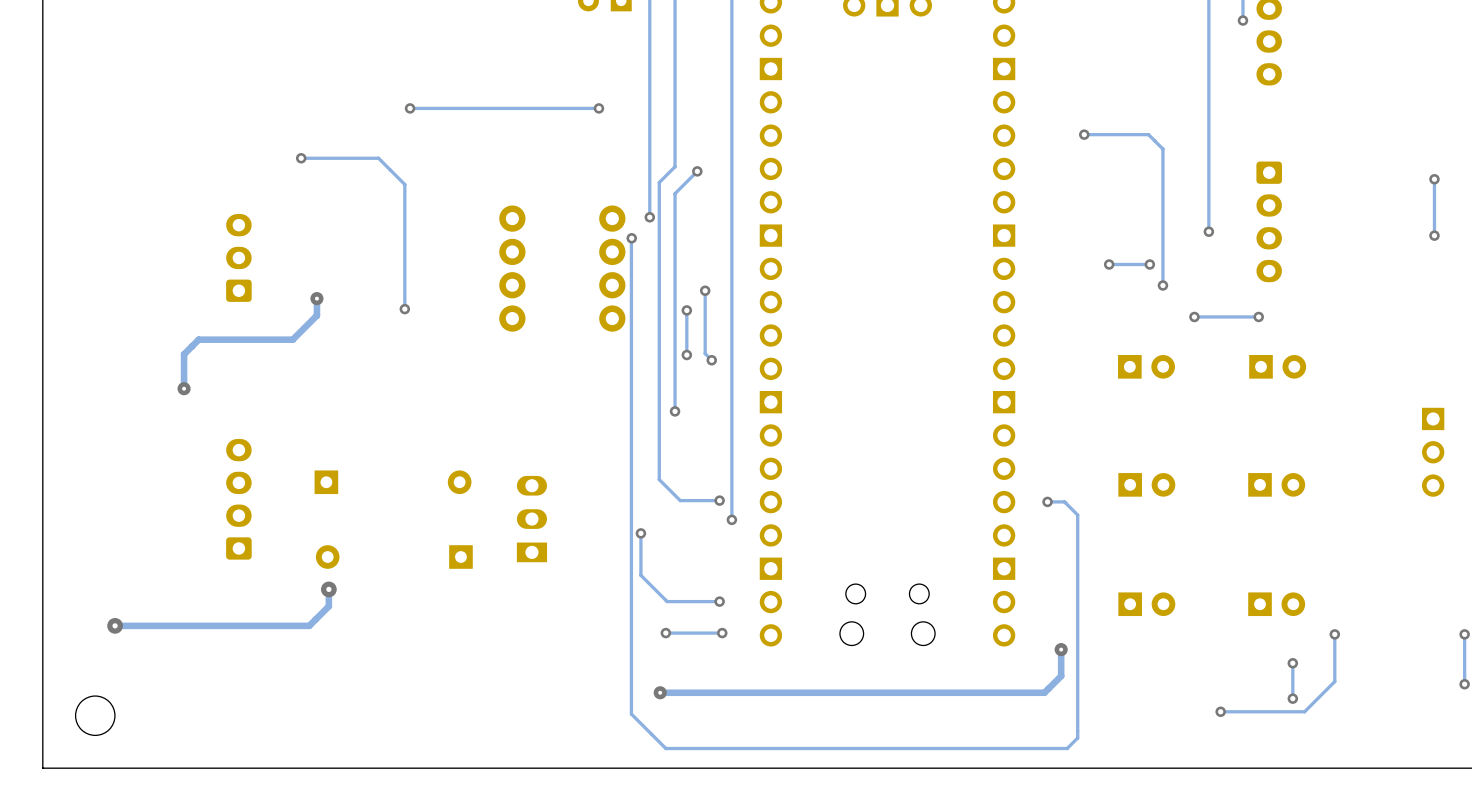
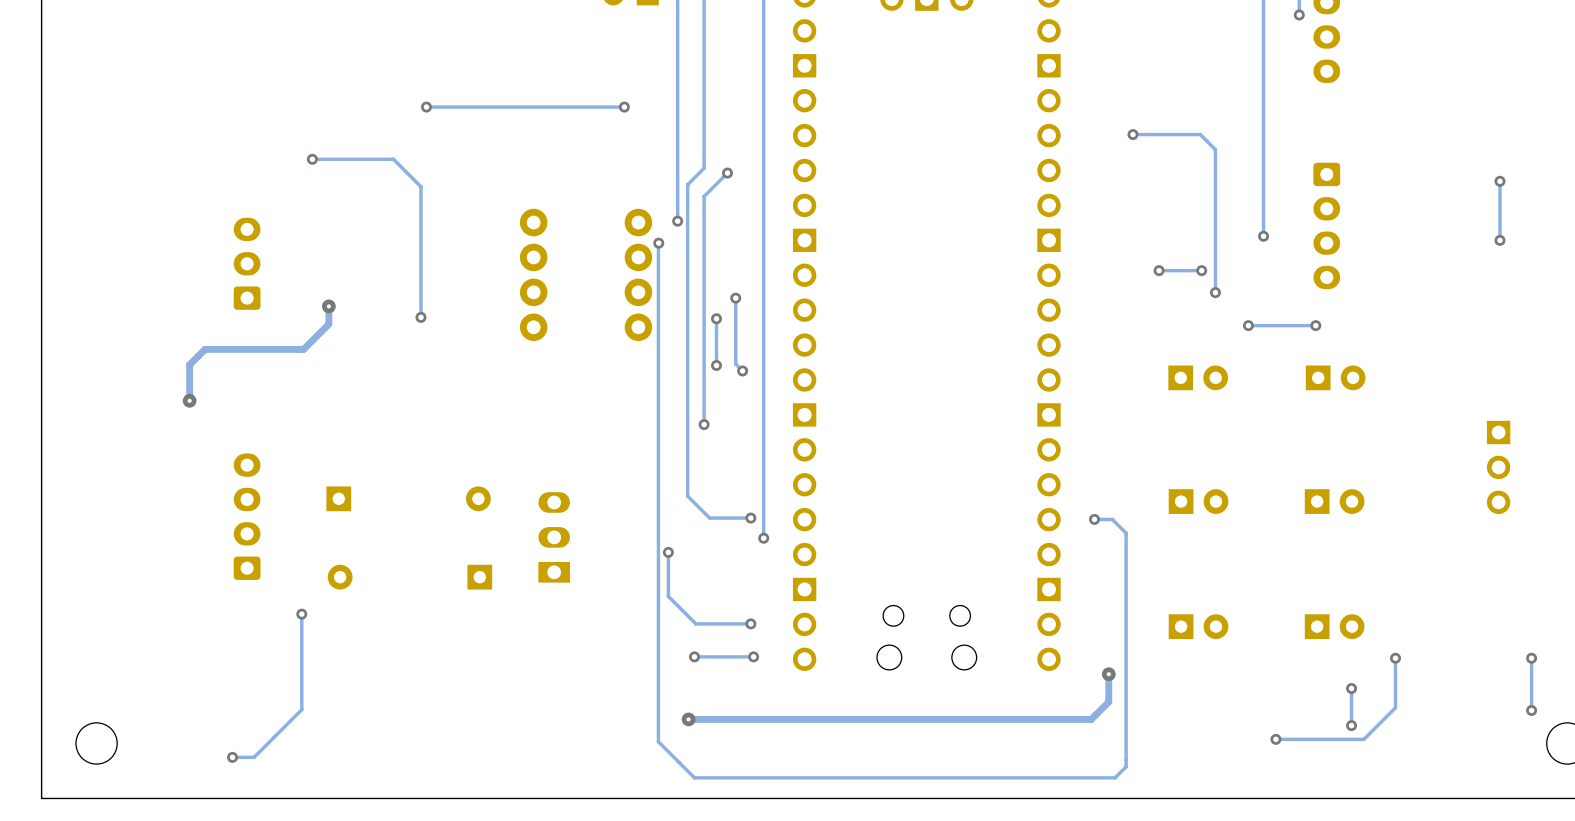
track: (328, 589) (328, 606) (309, 625) (115, 625) -> none
via: (328, 589) -> none
track: none -> (301, 614) (301, 709) (254, 757) (232, 757)
via: none -> (301, 614)
via: (115, 625) -> none
via: none -> (232, 757)

